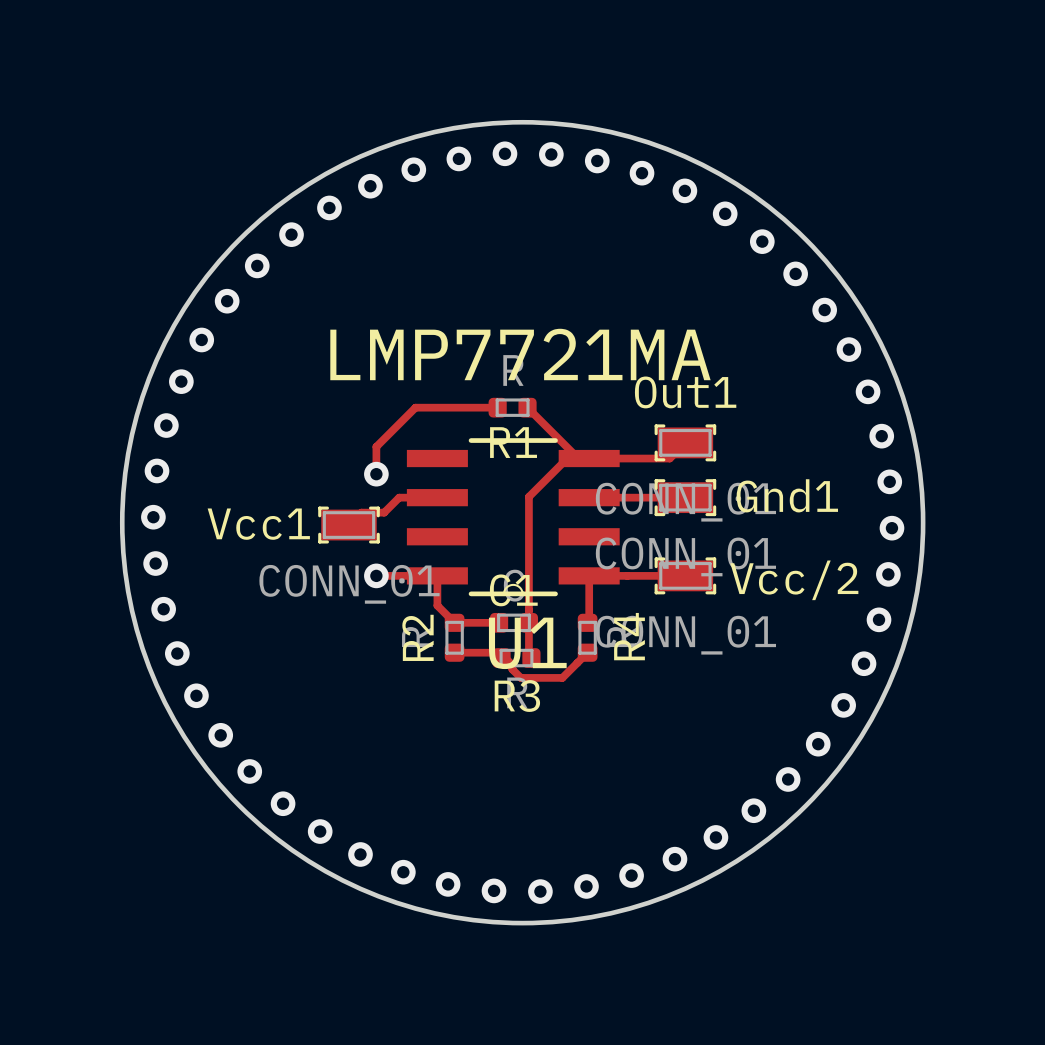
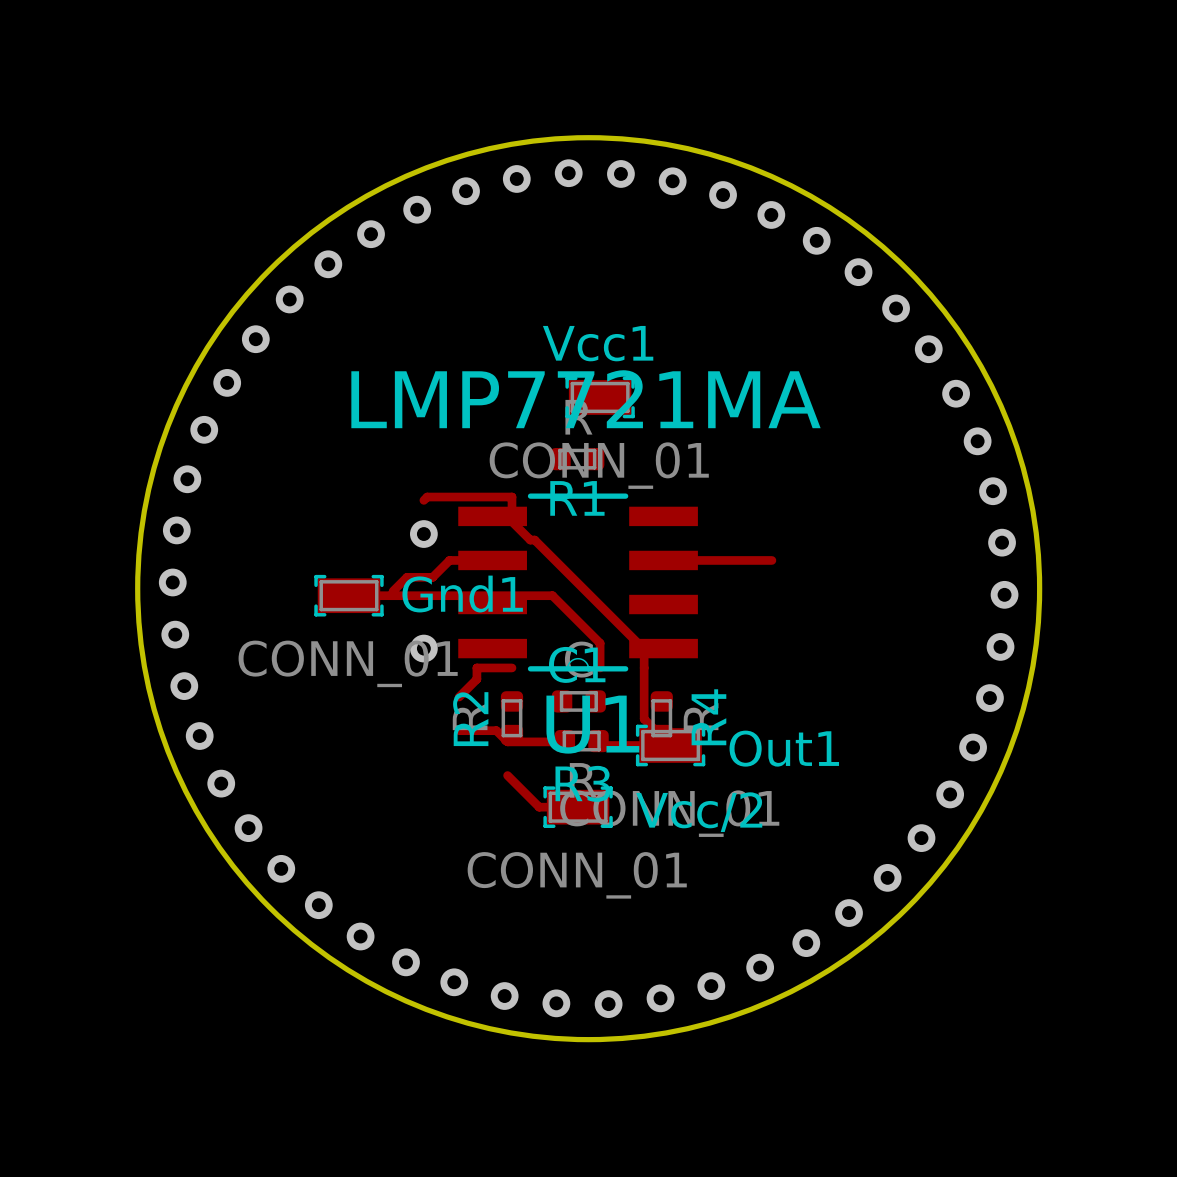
Out1 name position: Out1 (685, 392) -> Out1 (784, 748)
track: (497, 407) (415, 407) (376, 446) (376, 474) -> none
track: (527, 407) (578, 458) -> none
track: (685, 442) (669, 458) (567, 458) (528, 496) (528, 655) (531, 658) -> none
Out1 position: (685, 442) -> (670, 745)
track: none -> (423, 500) (427, 497) (512, 497) (512, 521) (530, 540) (534, 540) (644, 649) (644, 719) (670, 745) (594, 745)
Gnd1 position: (685, 497) -> (348, 595)
Vcc1 name position: Vcc1 (258, 524) -> Vcc1 (598, 343)
Vcc1 position: (348, 525) -> (600, 397)
track: none -> (348, 595) (552, 595) (600, 643) (600, 667)
track: (376, 575) (437, 575) (437, 605) (454, 622) (499, 622) -> none
track: (685, 575) (589, 575) (589, 621) (587, 622) -> none
Vcc/2 position: (685, 575) -> (578, 807)
track: none -> (512, 667) (476, 667) (476, 679) (459, 697)
track: none -> (459, 730) (496, 730) (507, 741) (556, 741) (560, 745)
track: (454, 652) (496, 652) (512, 664) (512, 669) (520, 677) (562, 677) (587, 652) -> none
track: none -> (507, 775) (539, 807) (578, 807)

